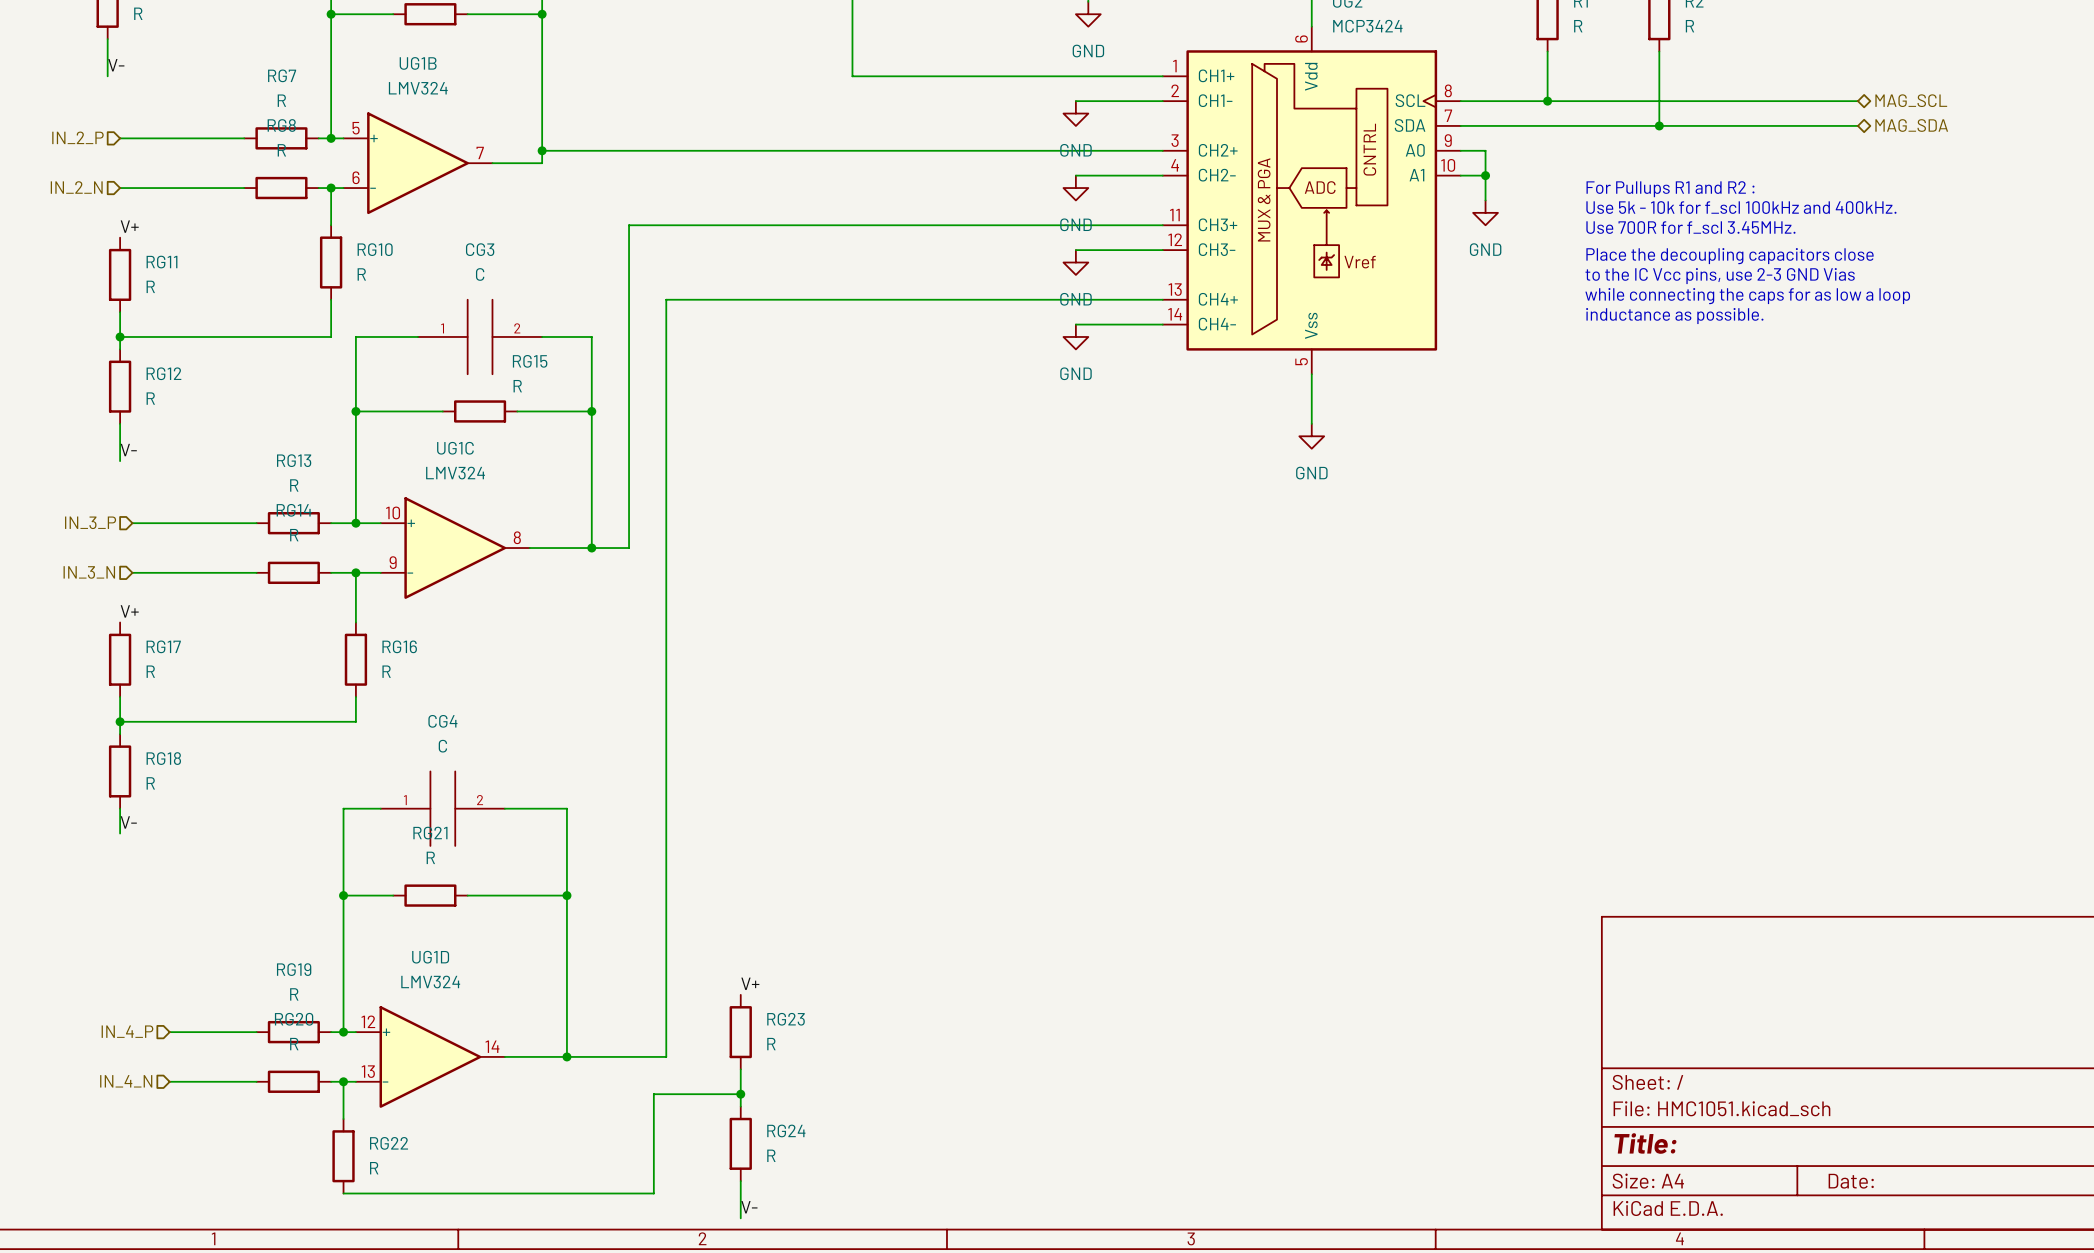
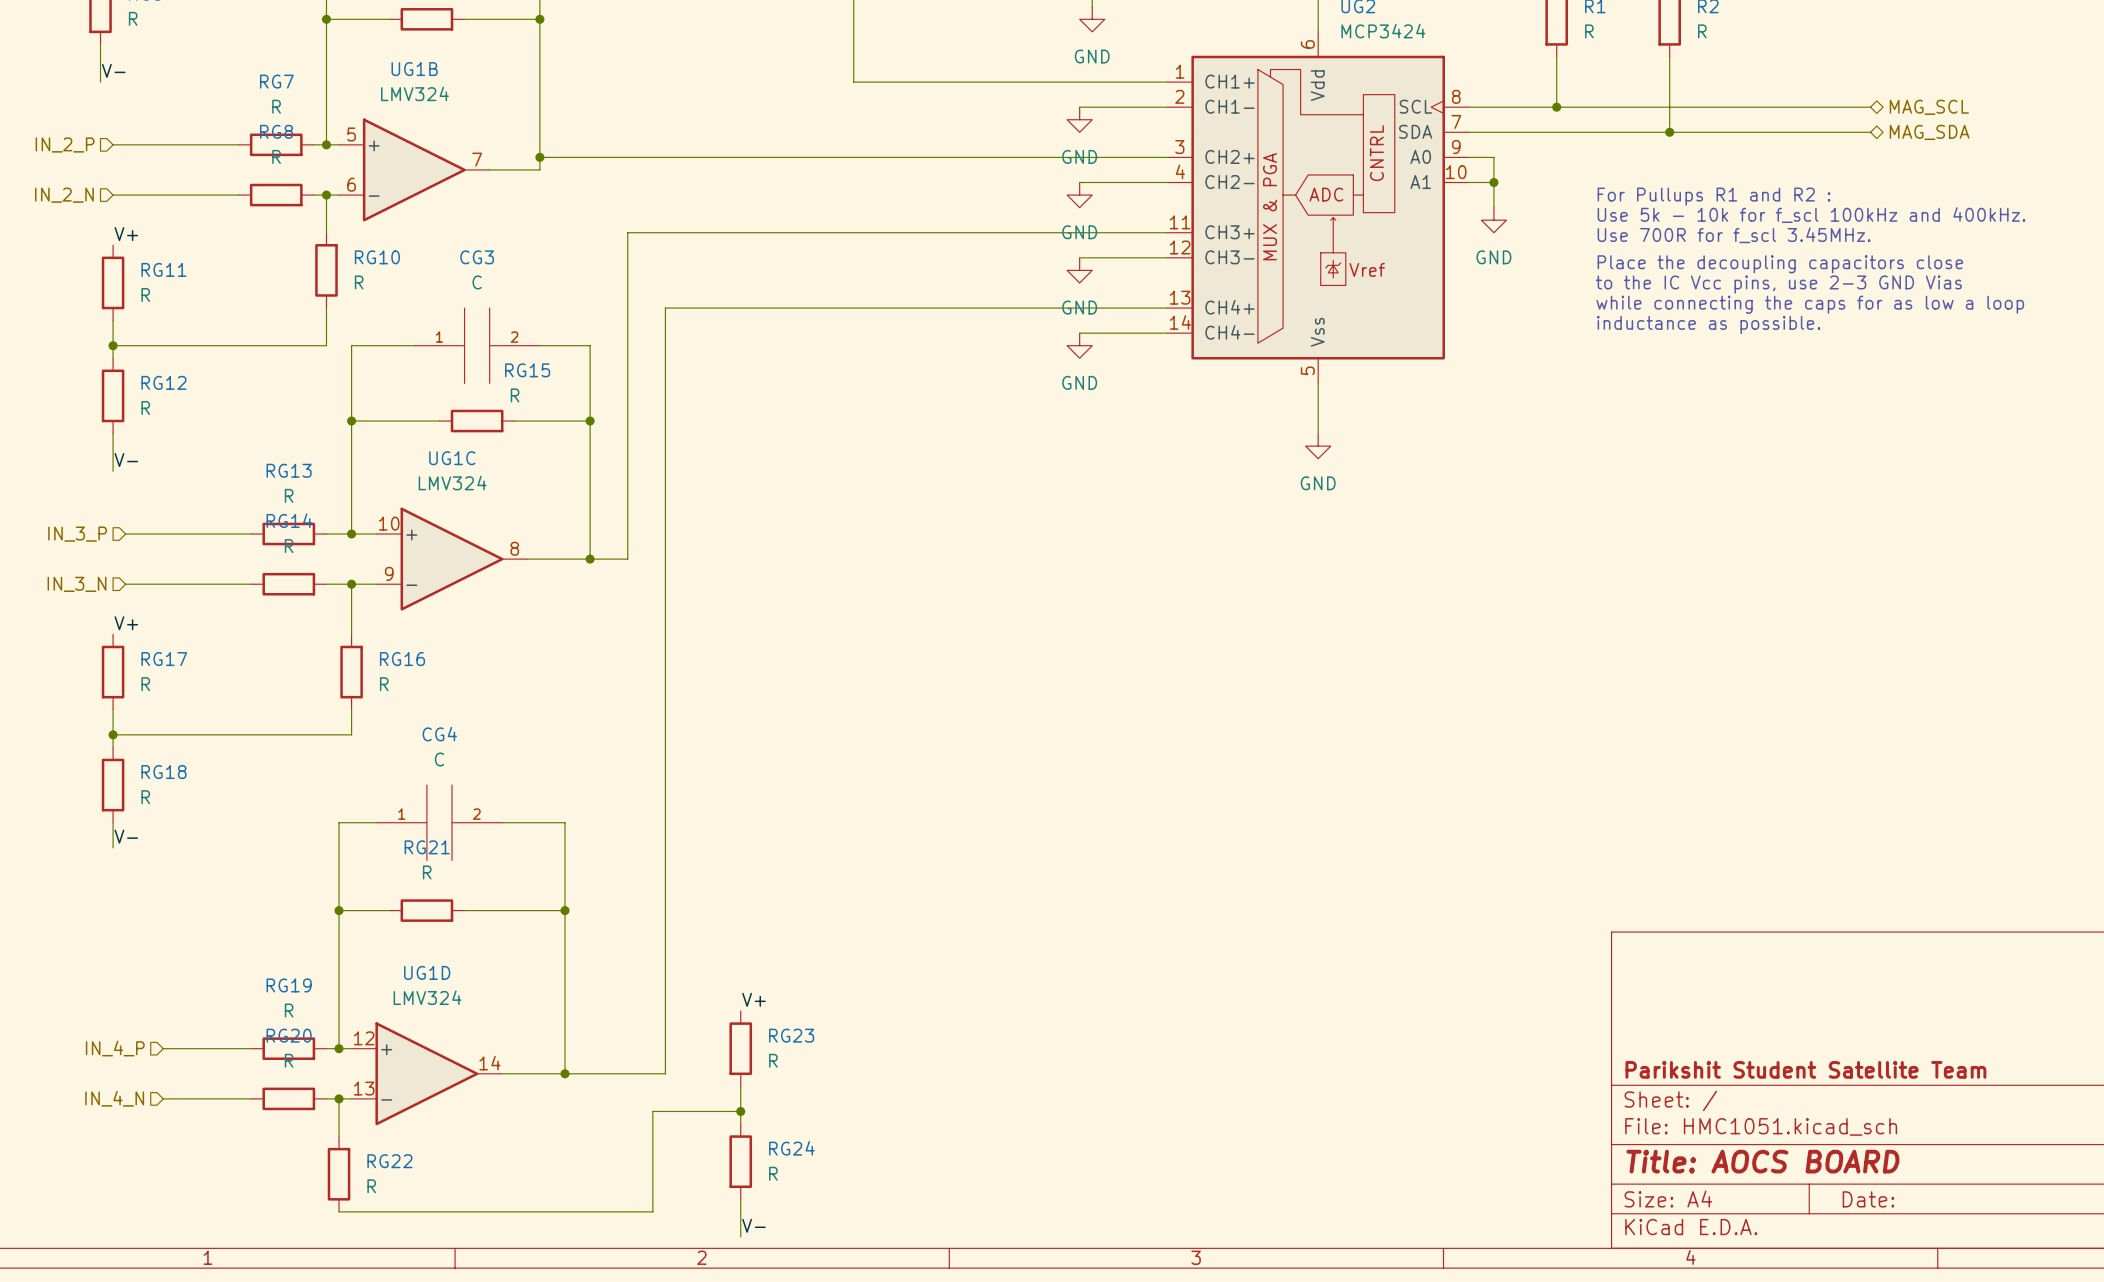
title block: none -> Parikshit Student Satellite Team (1805, 1069)
title block: Title: (1645, 1143) -> Title: AOCS BOARD (1762, 1161)

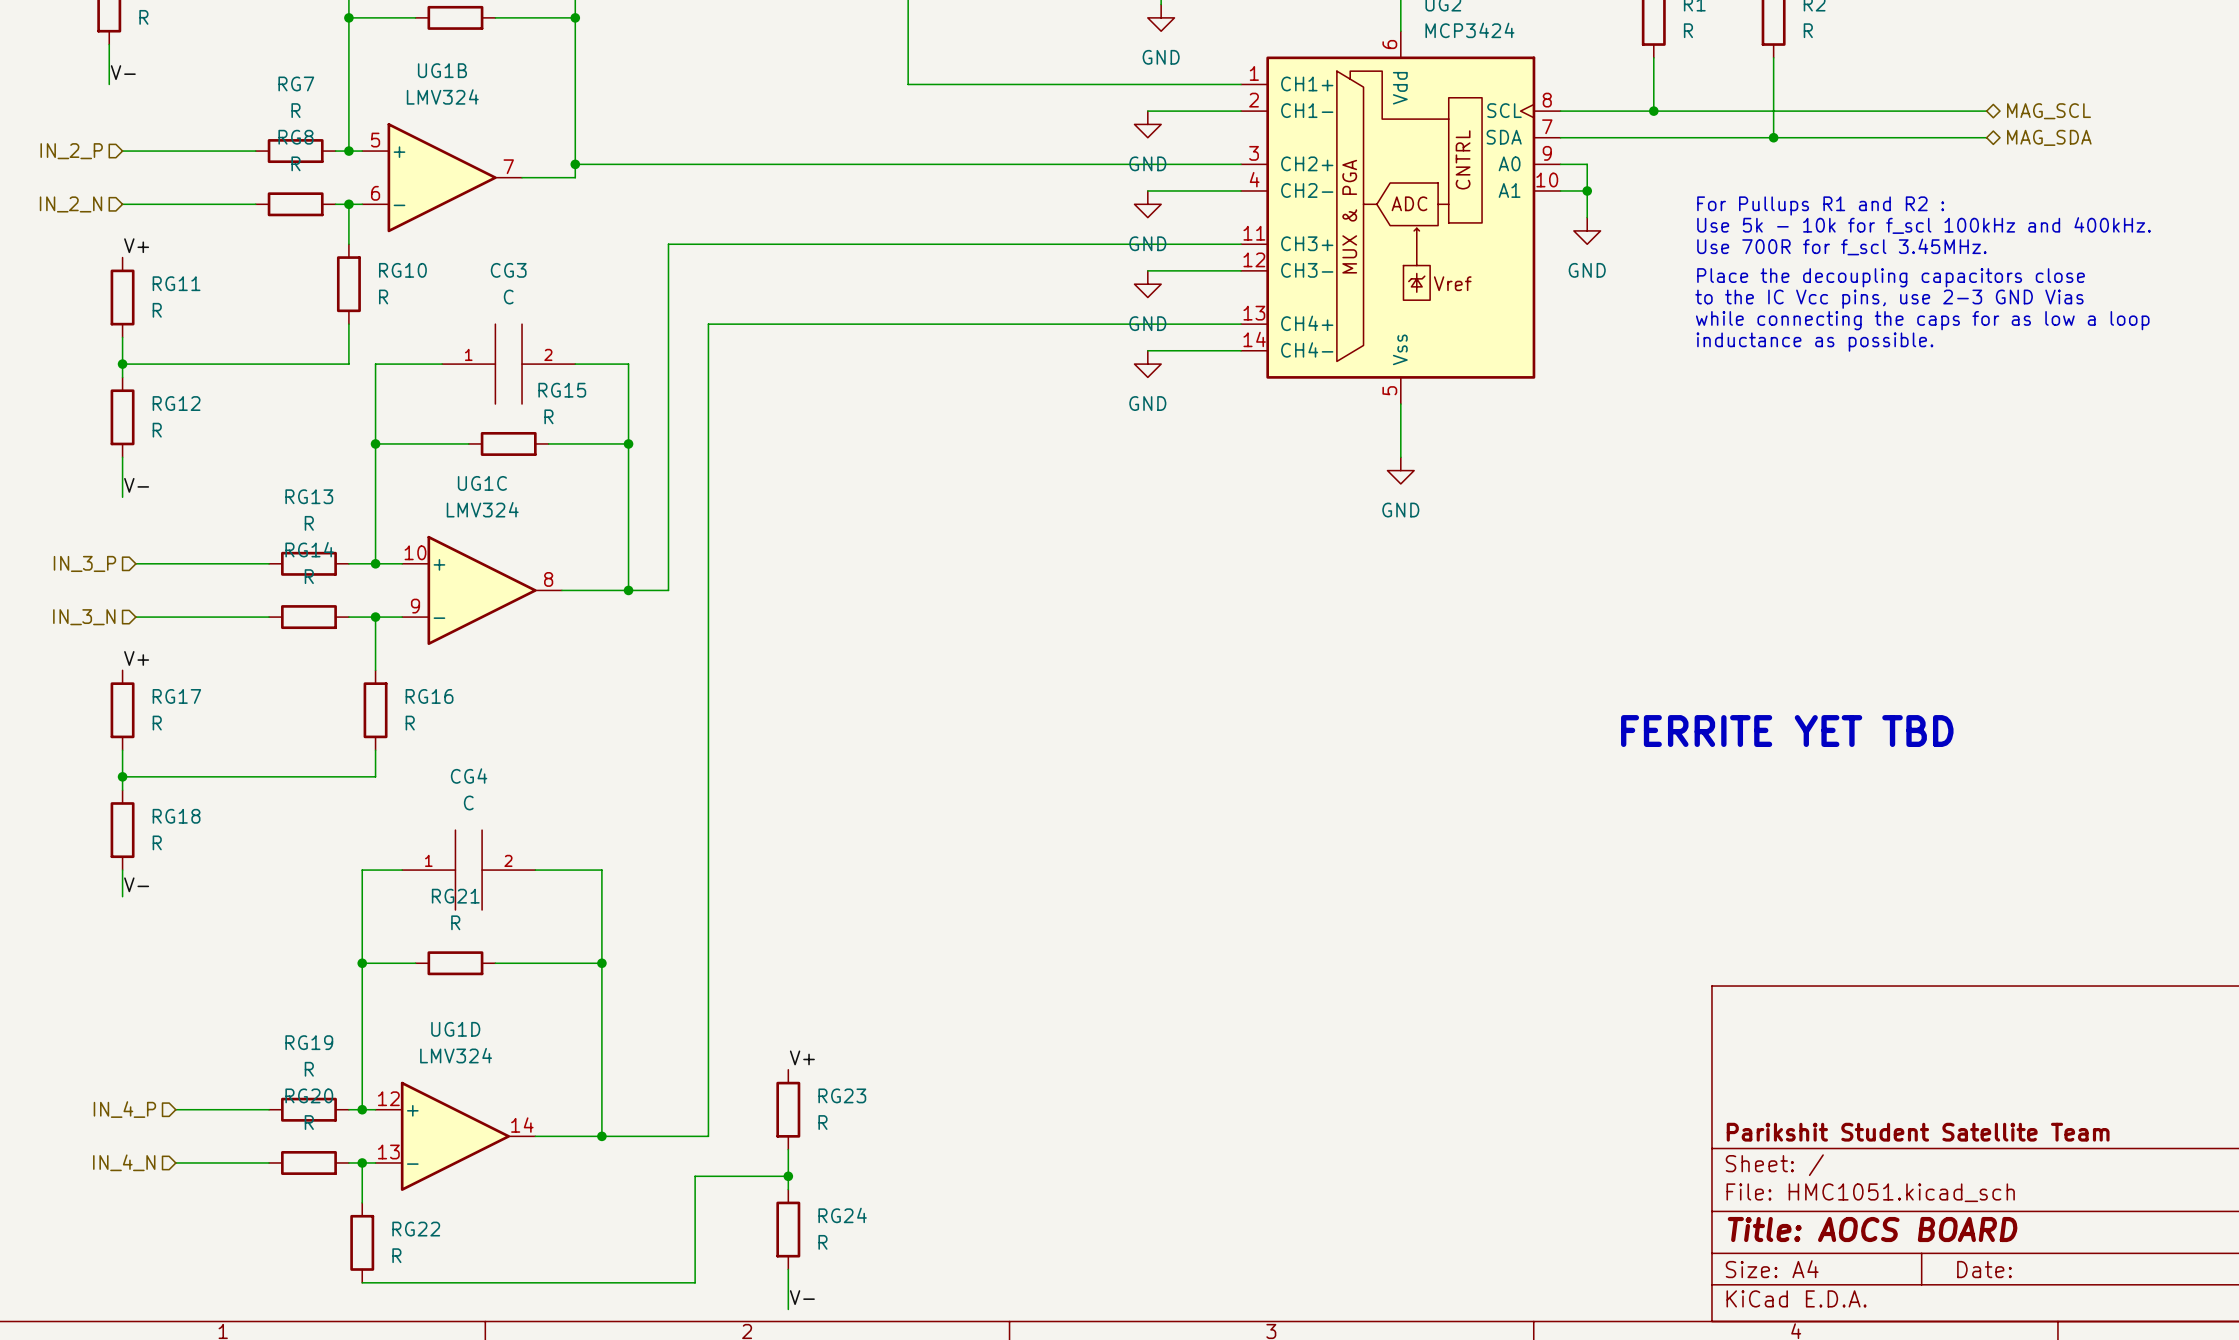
text: none -> FERRITE YET TBD (1787, 731)

